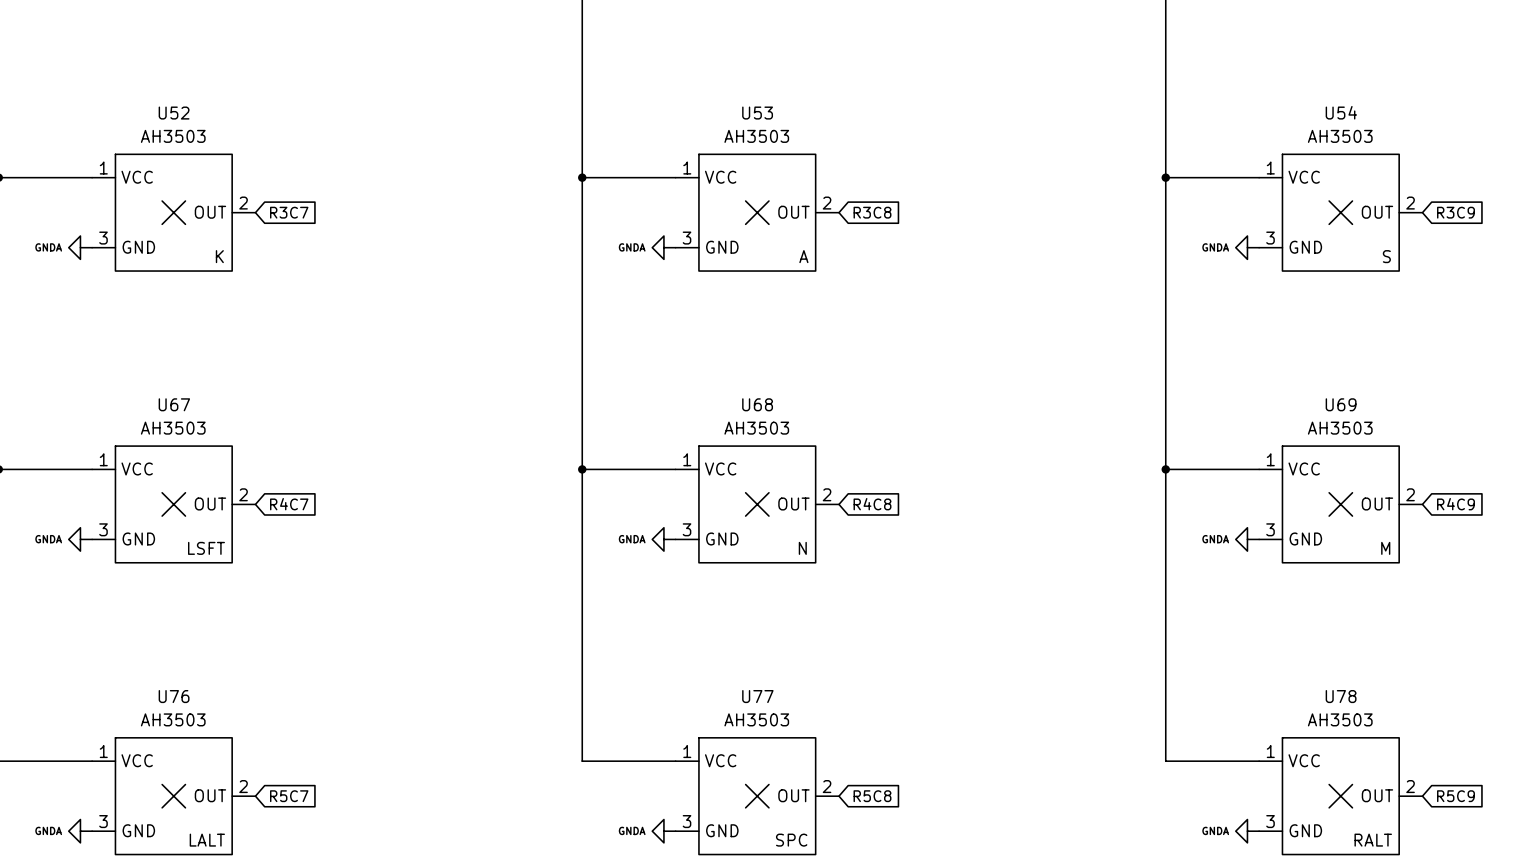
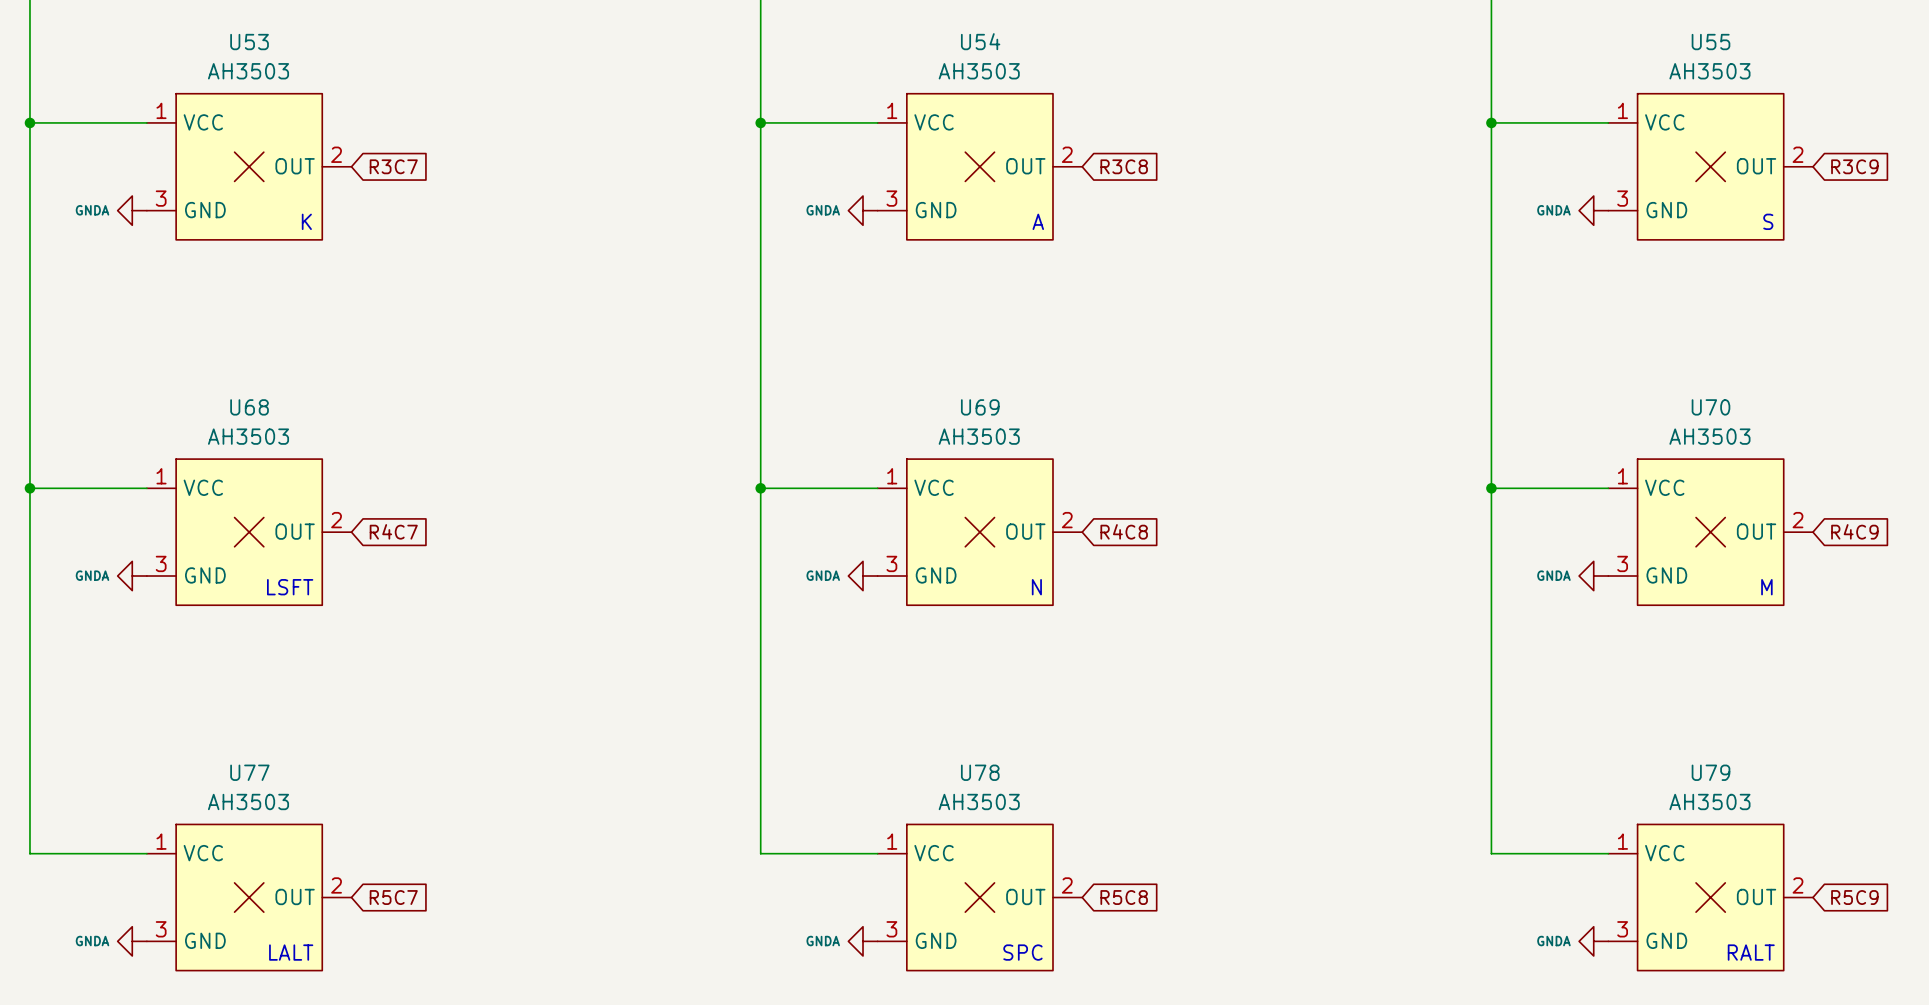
U54 name: U54 (1341, 112) -> U55 (1710, 42)
U52 name: U52 (174, 113) -> U53 (249, 42)
U53 name: U53 (757, 113) -> U54 (980, 41)
U67 name: U67 (174, 404) -> U68 (249, 407)
U68 name: U68 (757, 404) -> U69 (980, 407)
U69 name: U69 (1341, 404) -> U70 (1710, 407)
U76 name: U76 (174, 696) -> U77 (249, 772)
U77 name: U77 (757, 696) -> U78 (980, 772)
U78 name: U78 (1341, 696) -> U79 (1710, 772)

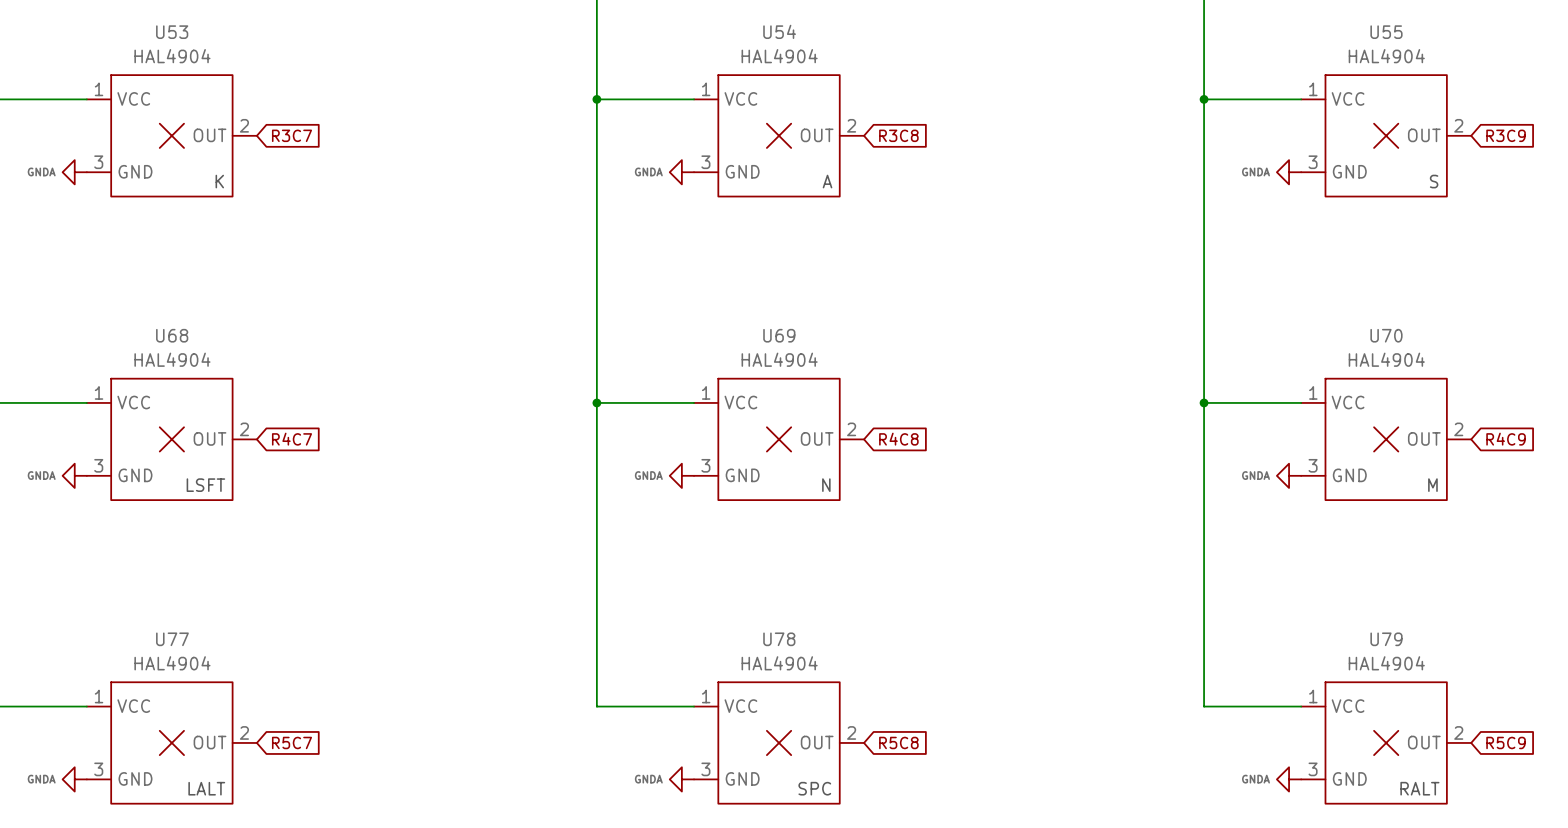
U53 value: AH3503 (248, 71) -> HAL4904 (172, 56)
U54 value: AH3503 (979, 71) -> HAL4904 (779, 56)
U55 value: AH3503 (1709, 71) -> HAL4904 (1386, 56)
U68 value: AH3503 (248, 436) -> HAL4904 (172, 359)
U69 value: AH3503 (979, 436) -> HAL4904 (779, 359)
U70 value: AH3503 (1709, 436) -> HAL4904 (1386, 359)
U77 value: AH3503 (248, 801) -> HAL4904 (172, 663)
U78 value: AH3503 (979, 801) -> HAL4904 (779, 663)
U79 value: AH3503 (1709, 801) -> HAL4904 (1386, 663)

